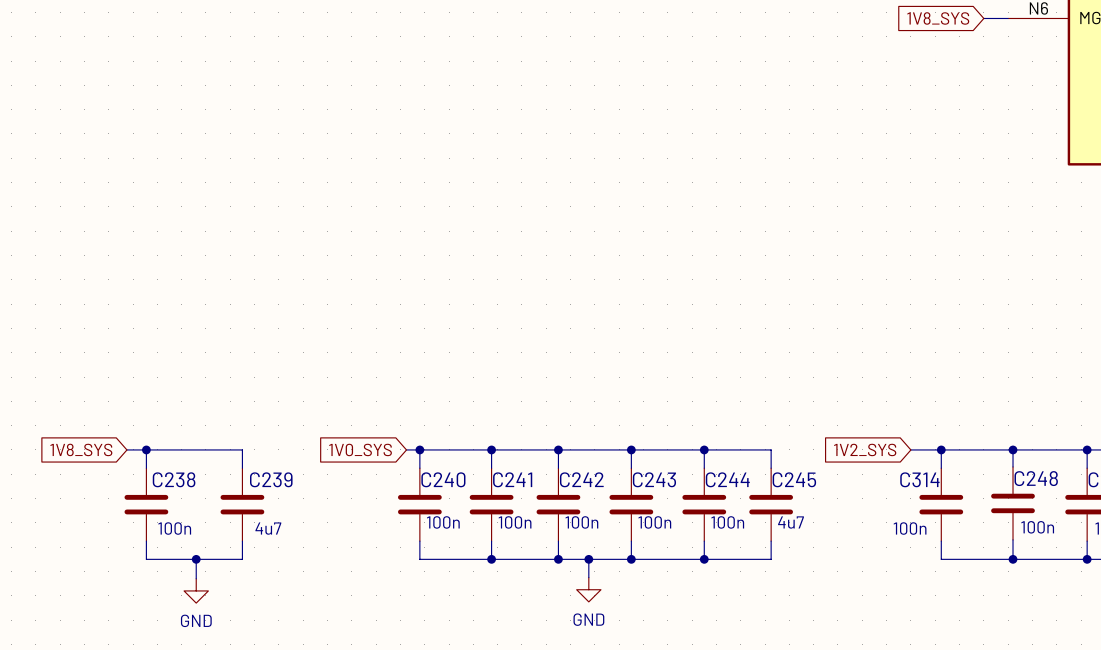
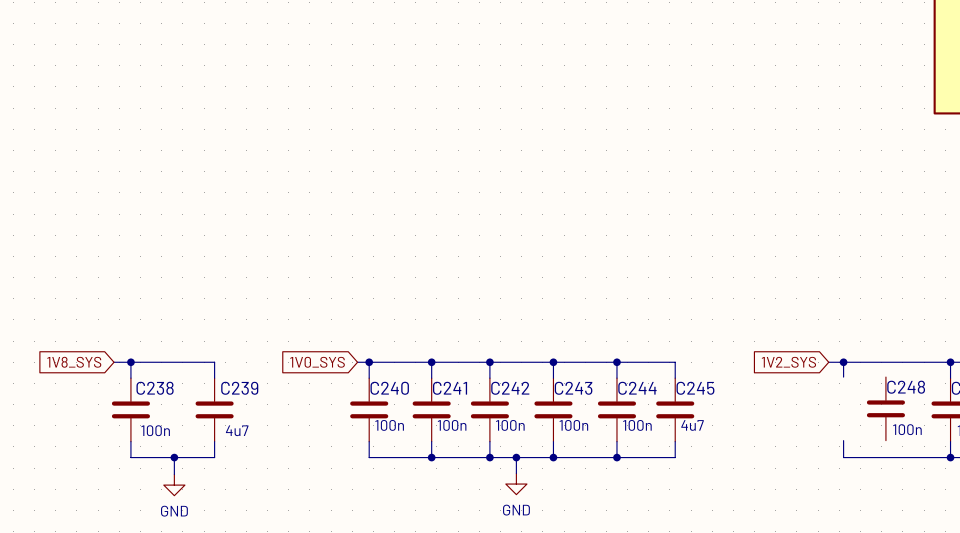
global label position: 1V2_SYS (865, 449) -> 1V2_SYS (788, 362)
wire: (910, 449) (947, 449) -> none
wire: (941, 449) (941, 468) -> none
junction position: (941, 449) -> (843, 362)
wire: (1013, 449) (1013, 466) -> (843, 362) (843, 377)
junction: (1013, 449) -> none
C314: (941, 504) -> none
wire: (1013, 539) (1013, 559) -> none
wire: (941, 541) (941, 559) (964, 559) -> (843, 440) (843, 457)
junction: (1013, 559) -> none

